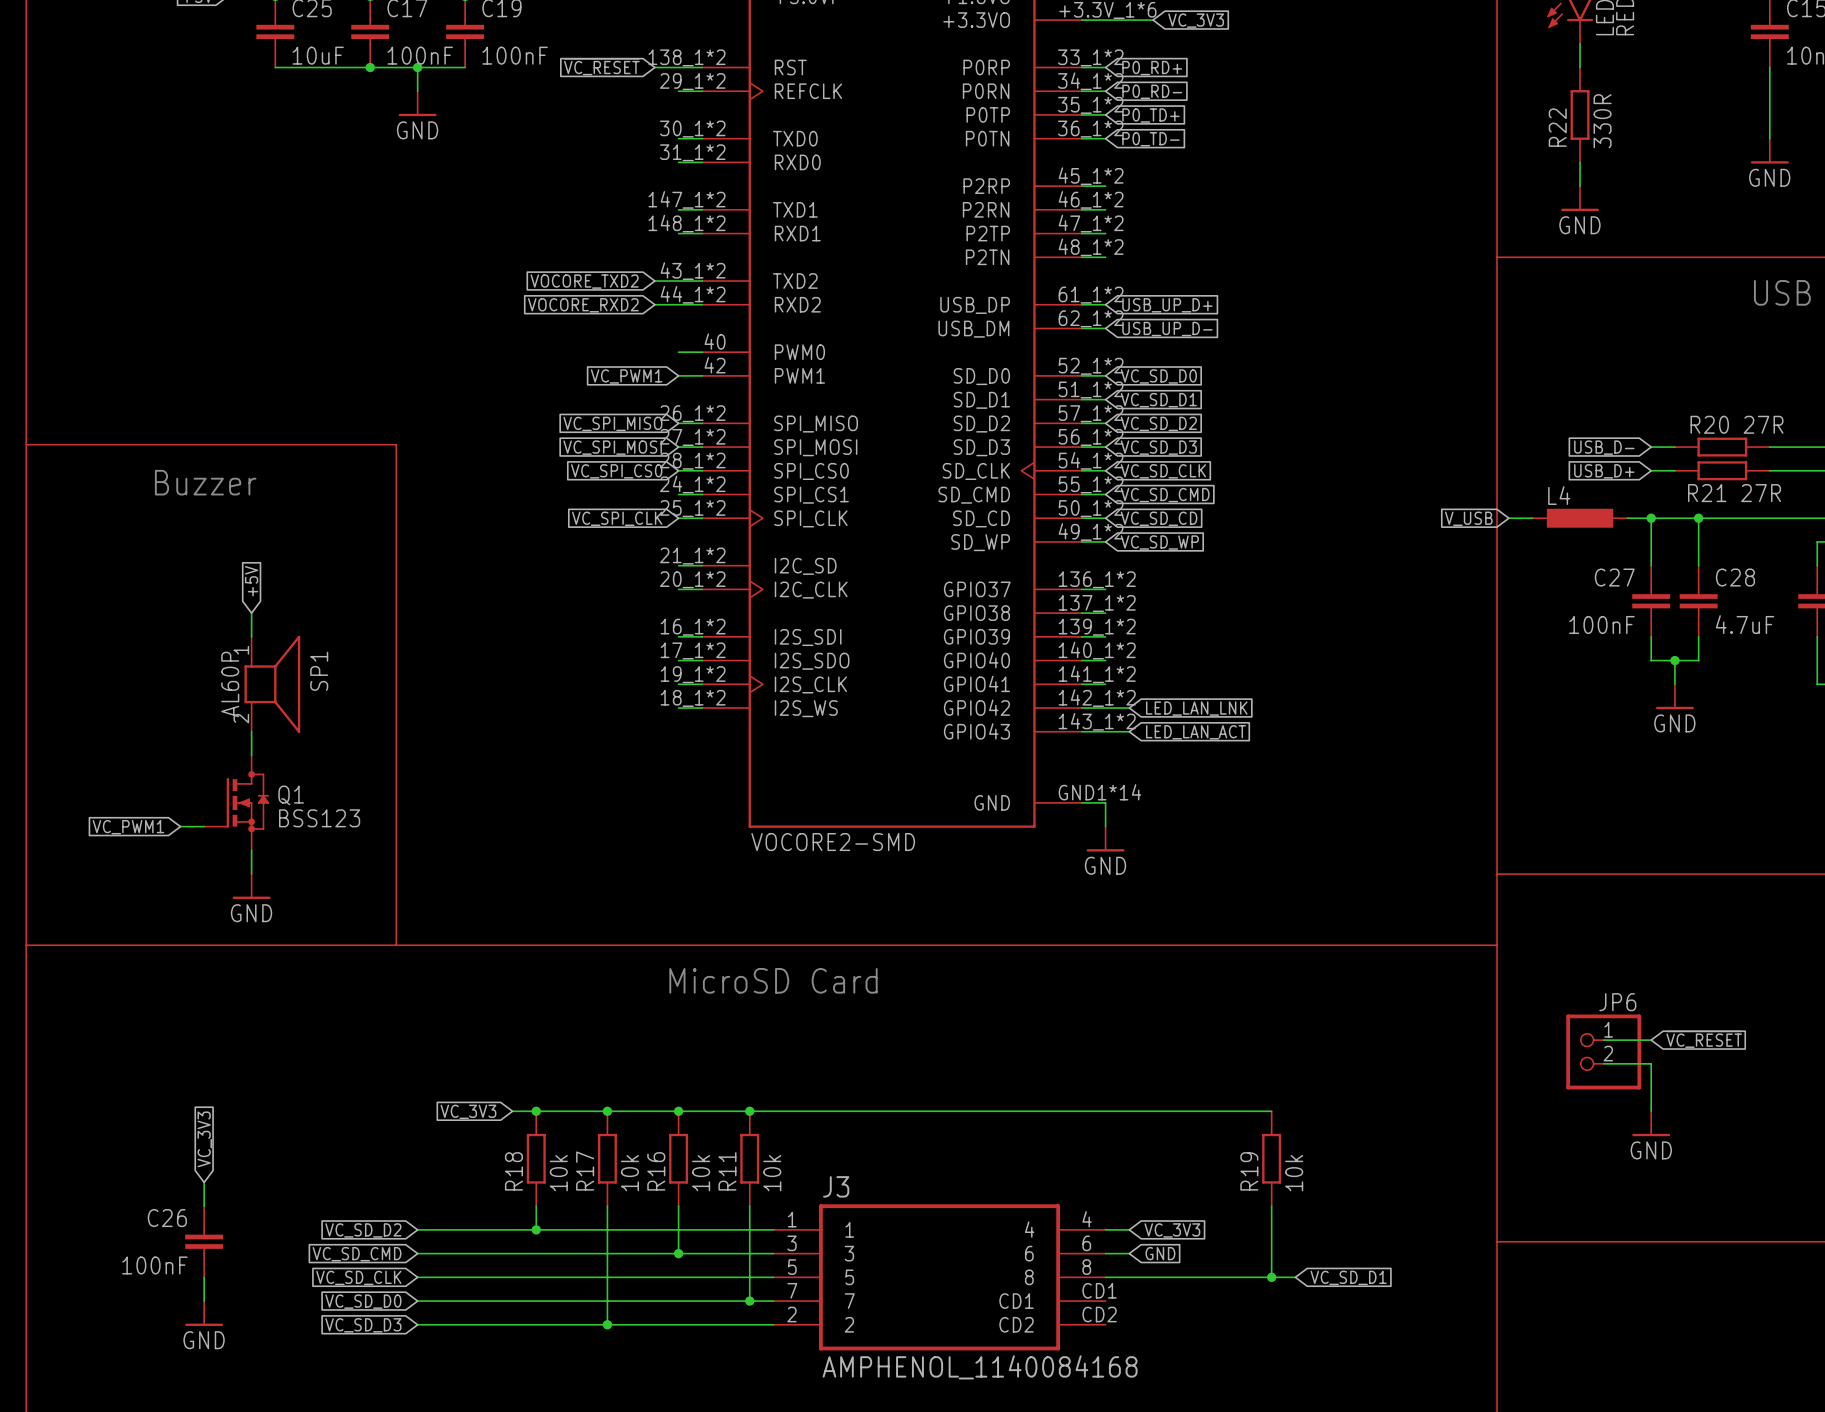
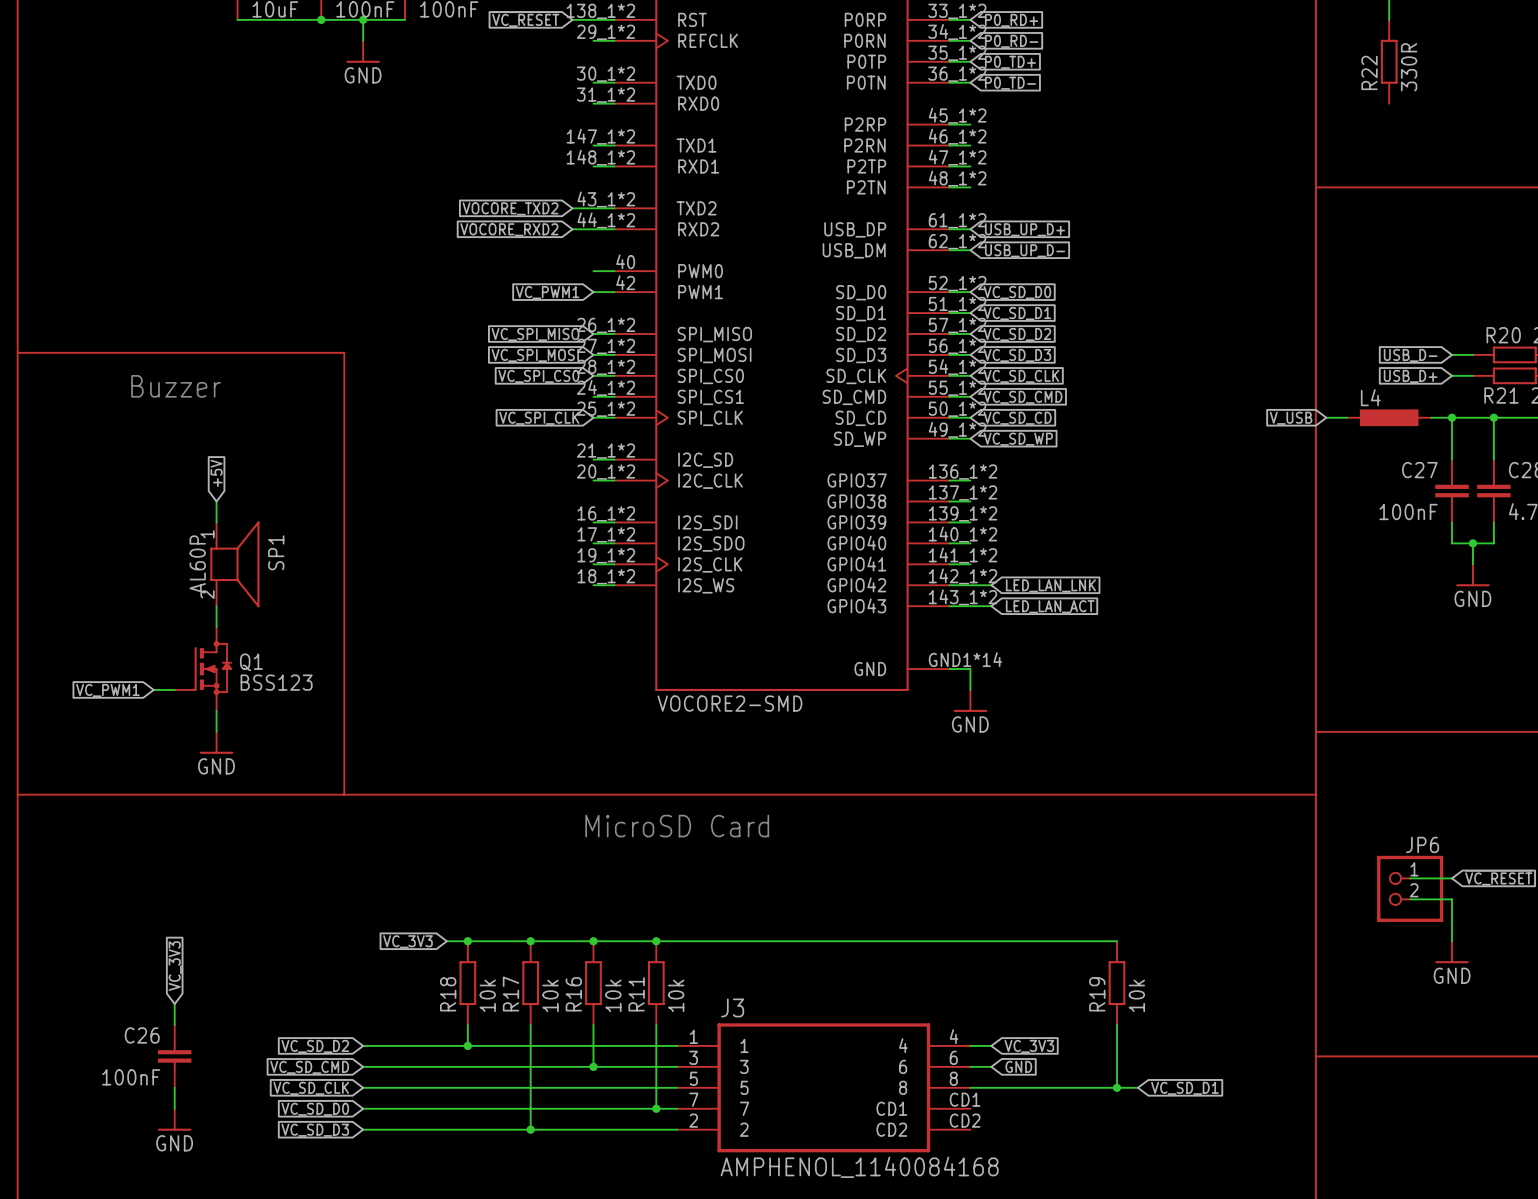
wire: (1580, 162) (1580, 186) -> none
power symbol: GND (1580, 198) -> none

